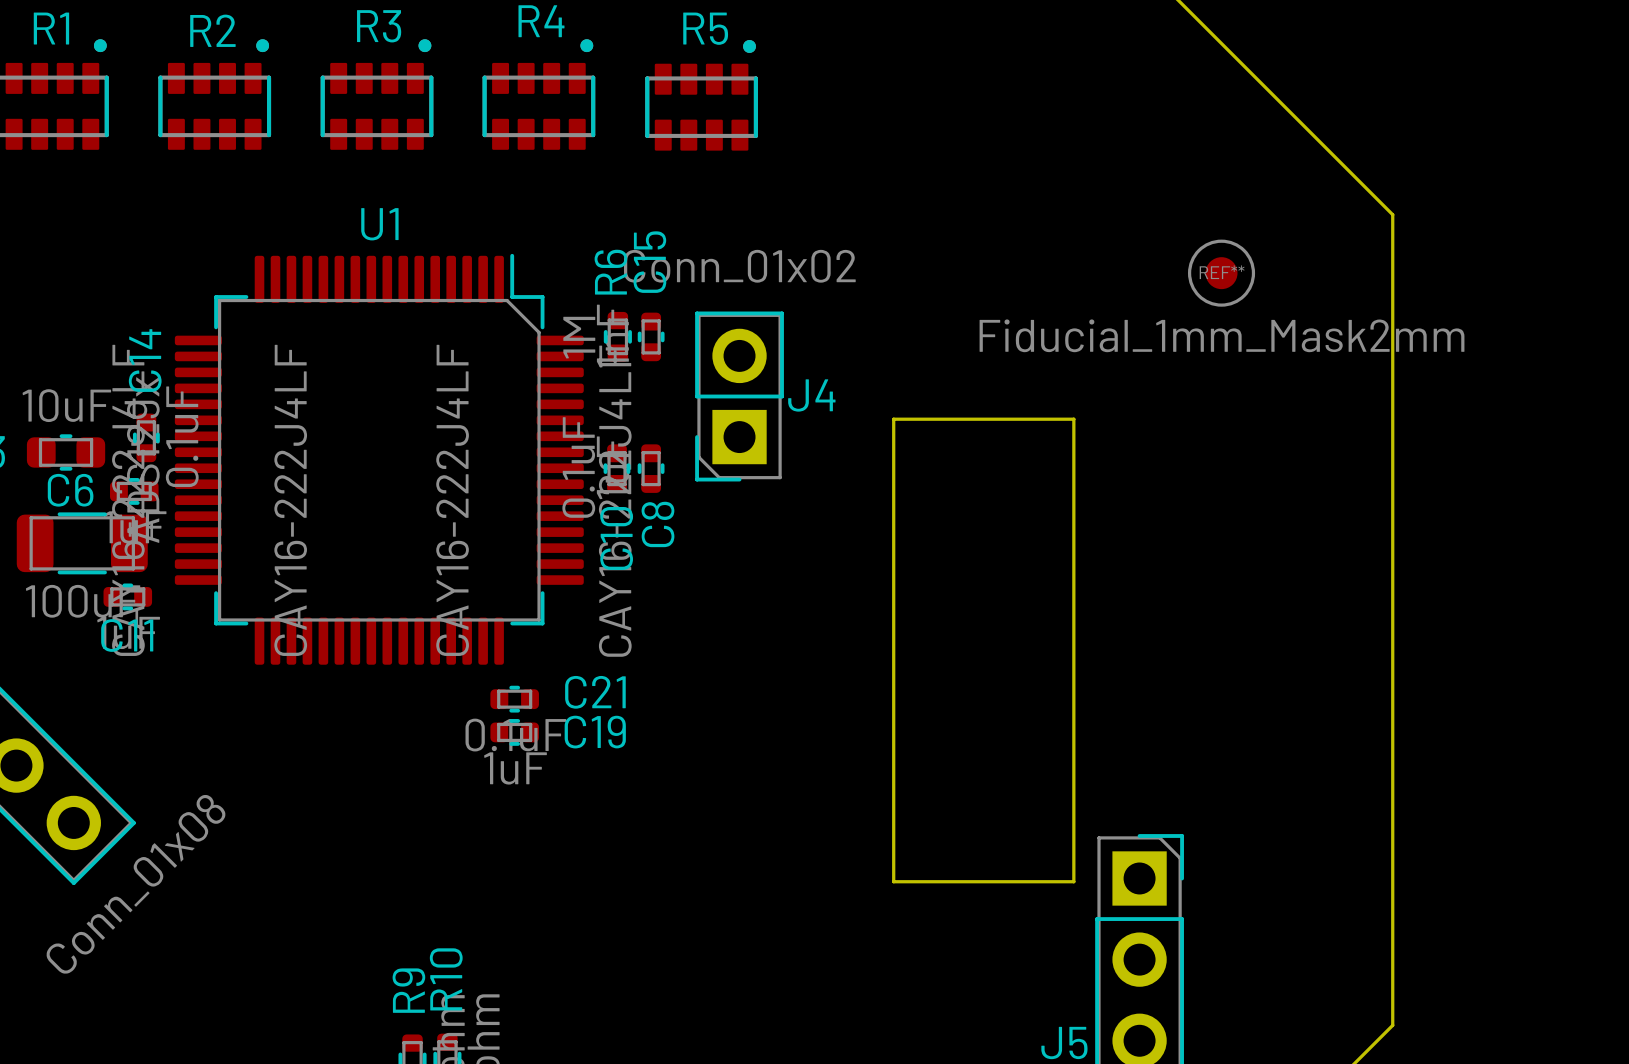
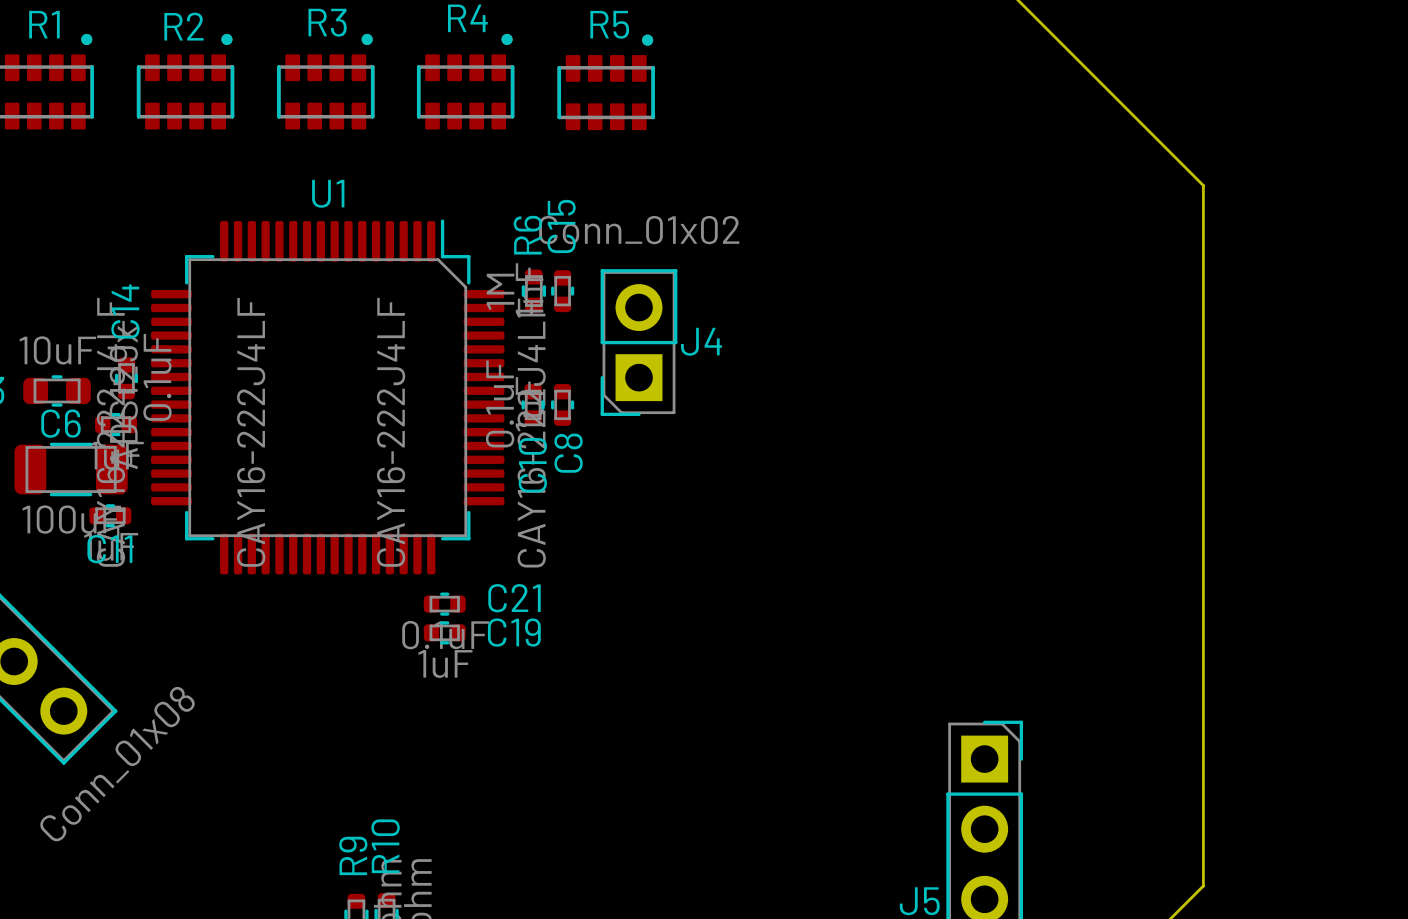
REF**: Fiducial_1mm_Mask2mm (1221, 273) -> none
board edge: (893, 419) (1073, 419) (1073, 881) (893, 881) (893, 419) -> none

